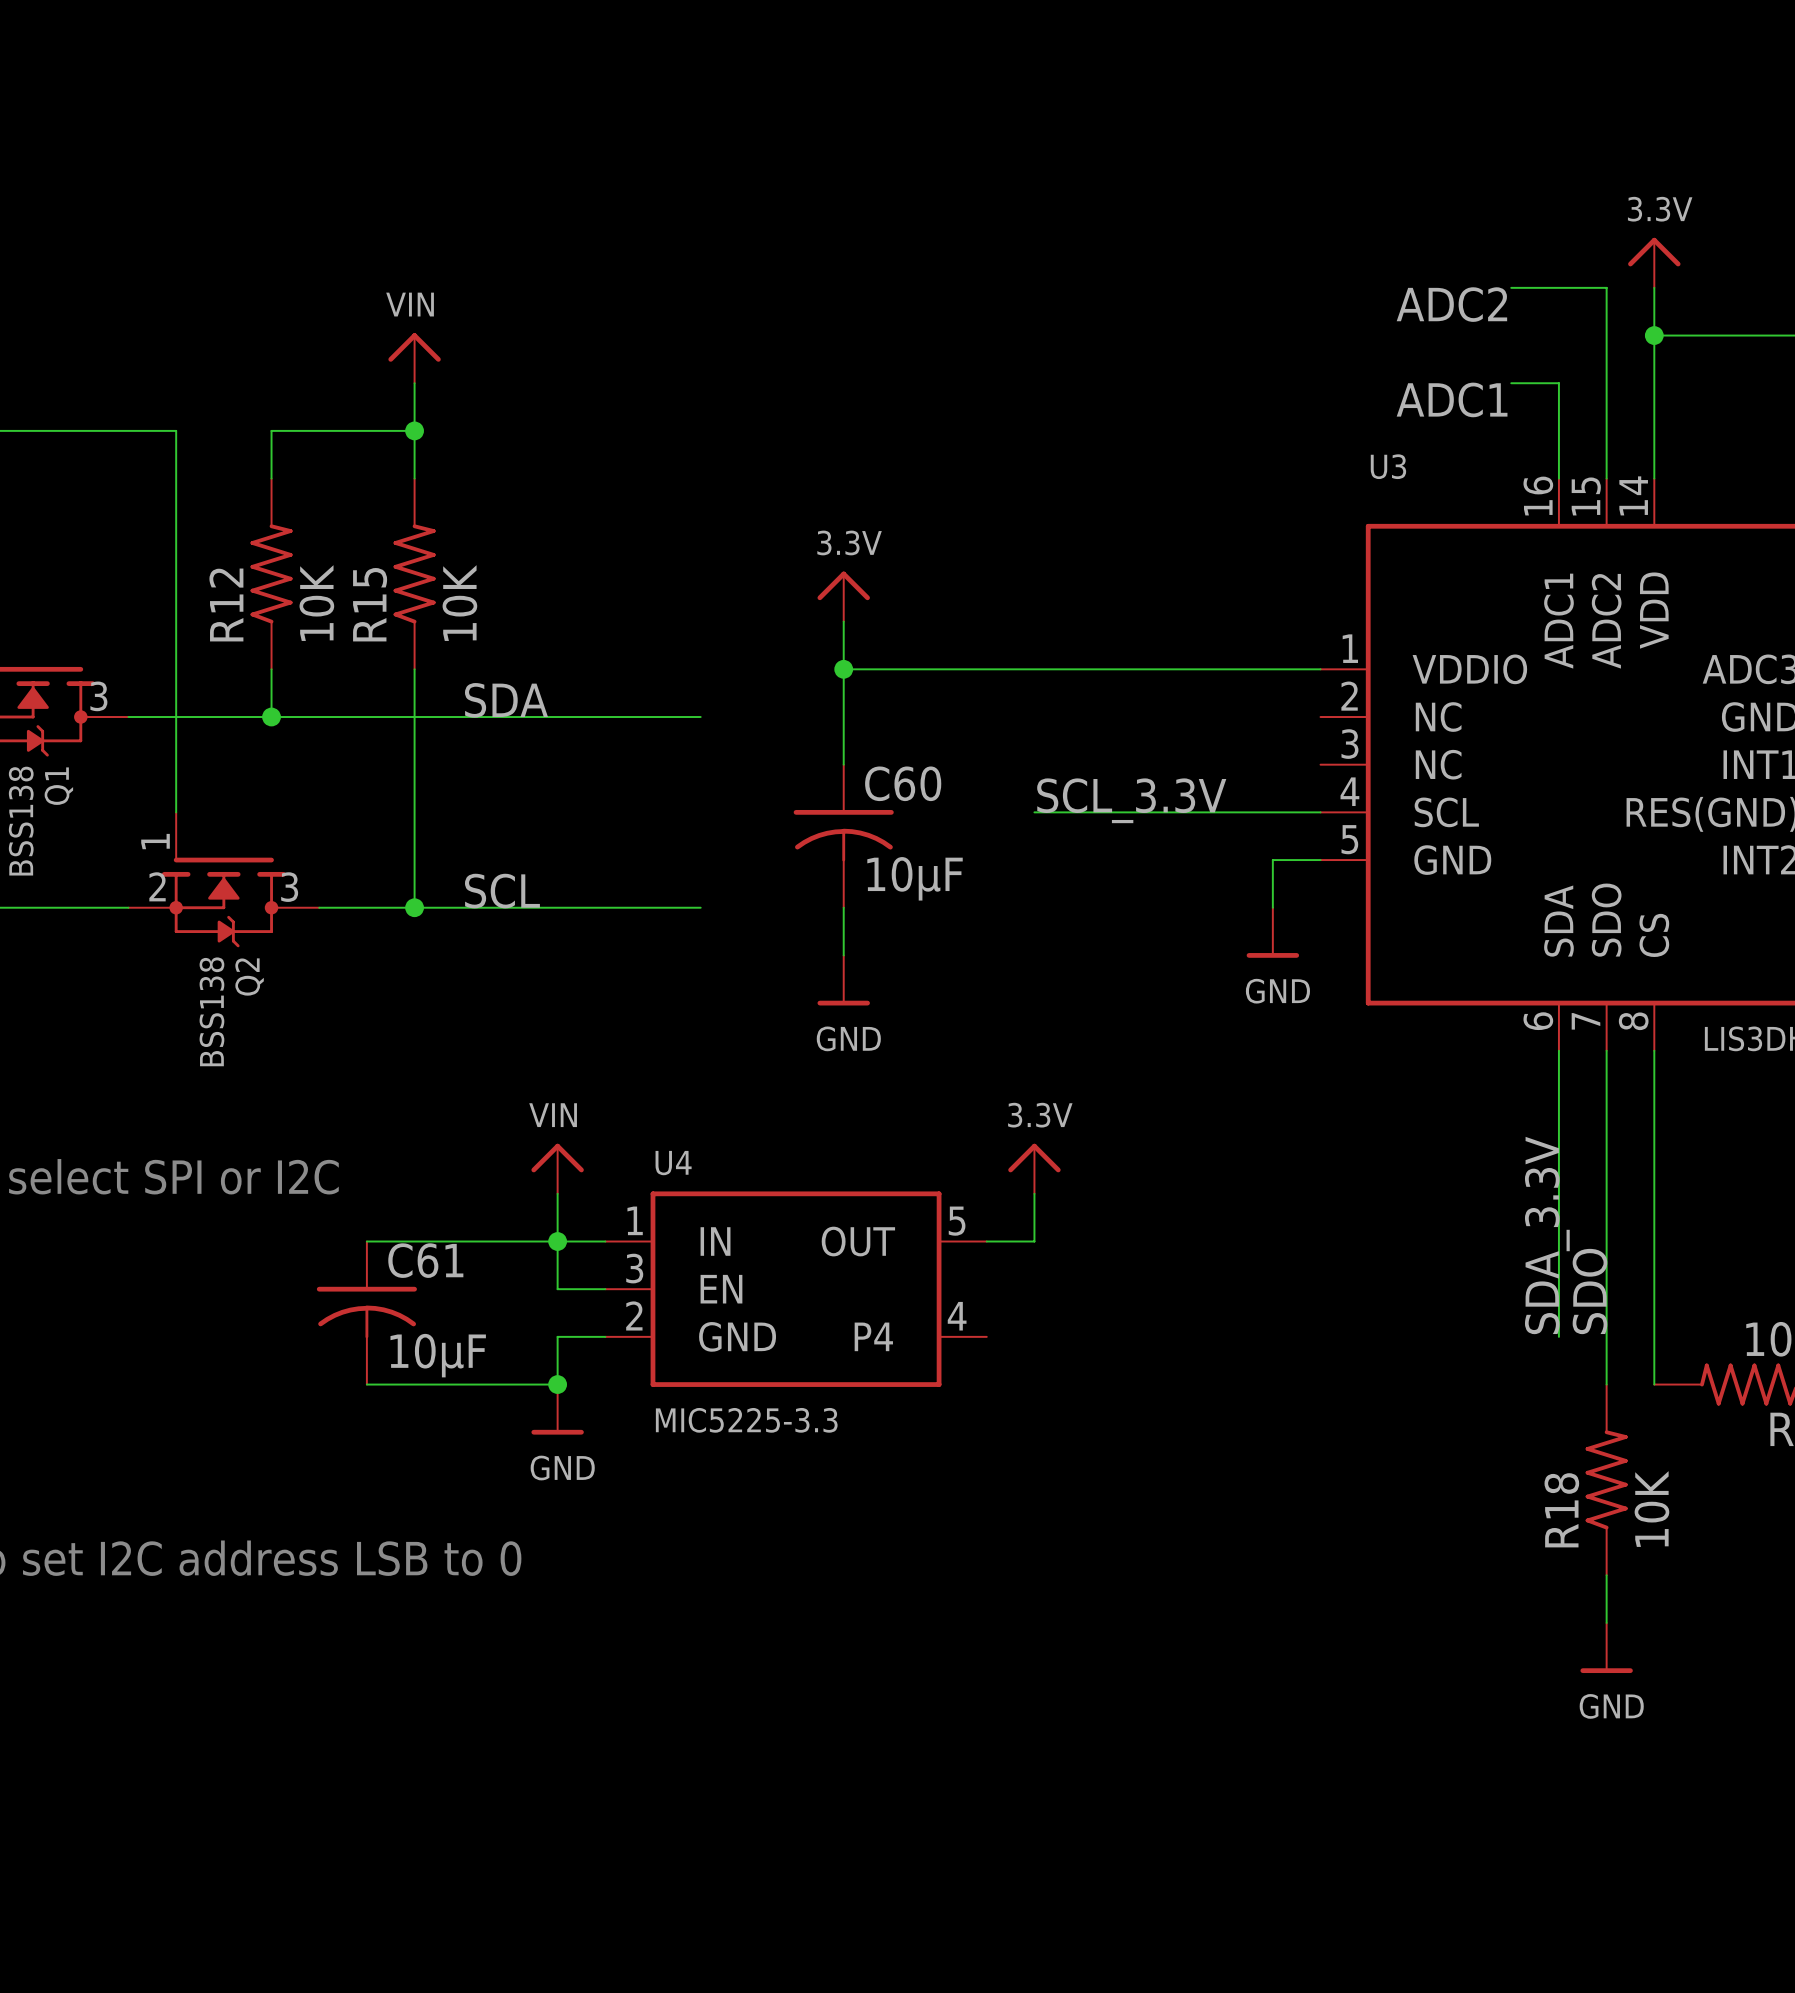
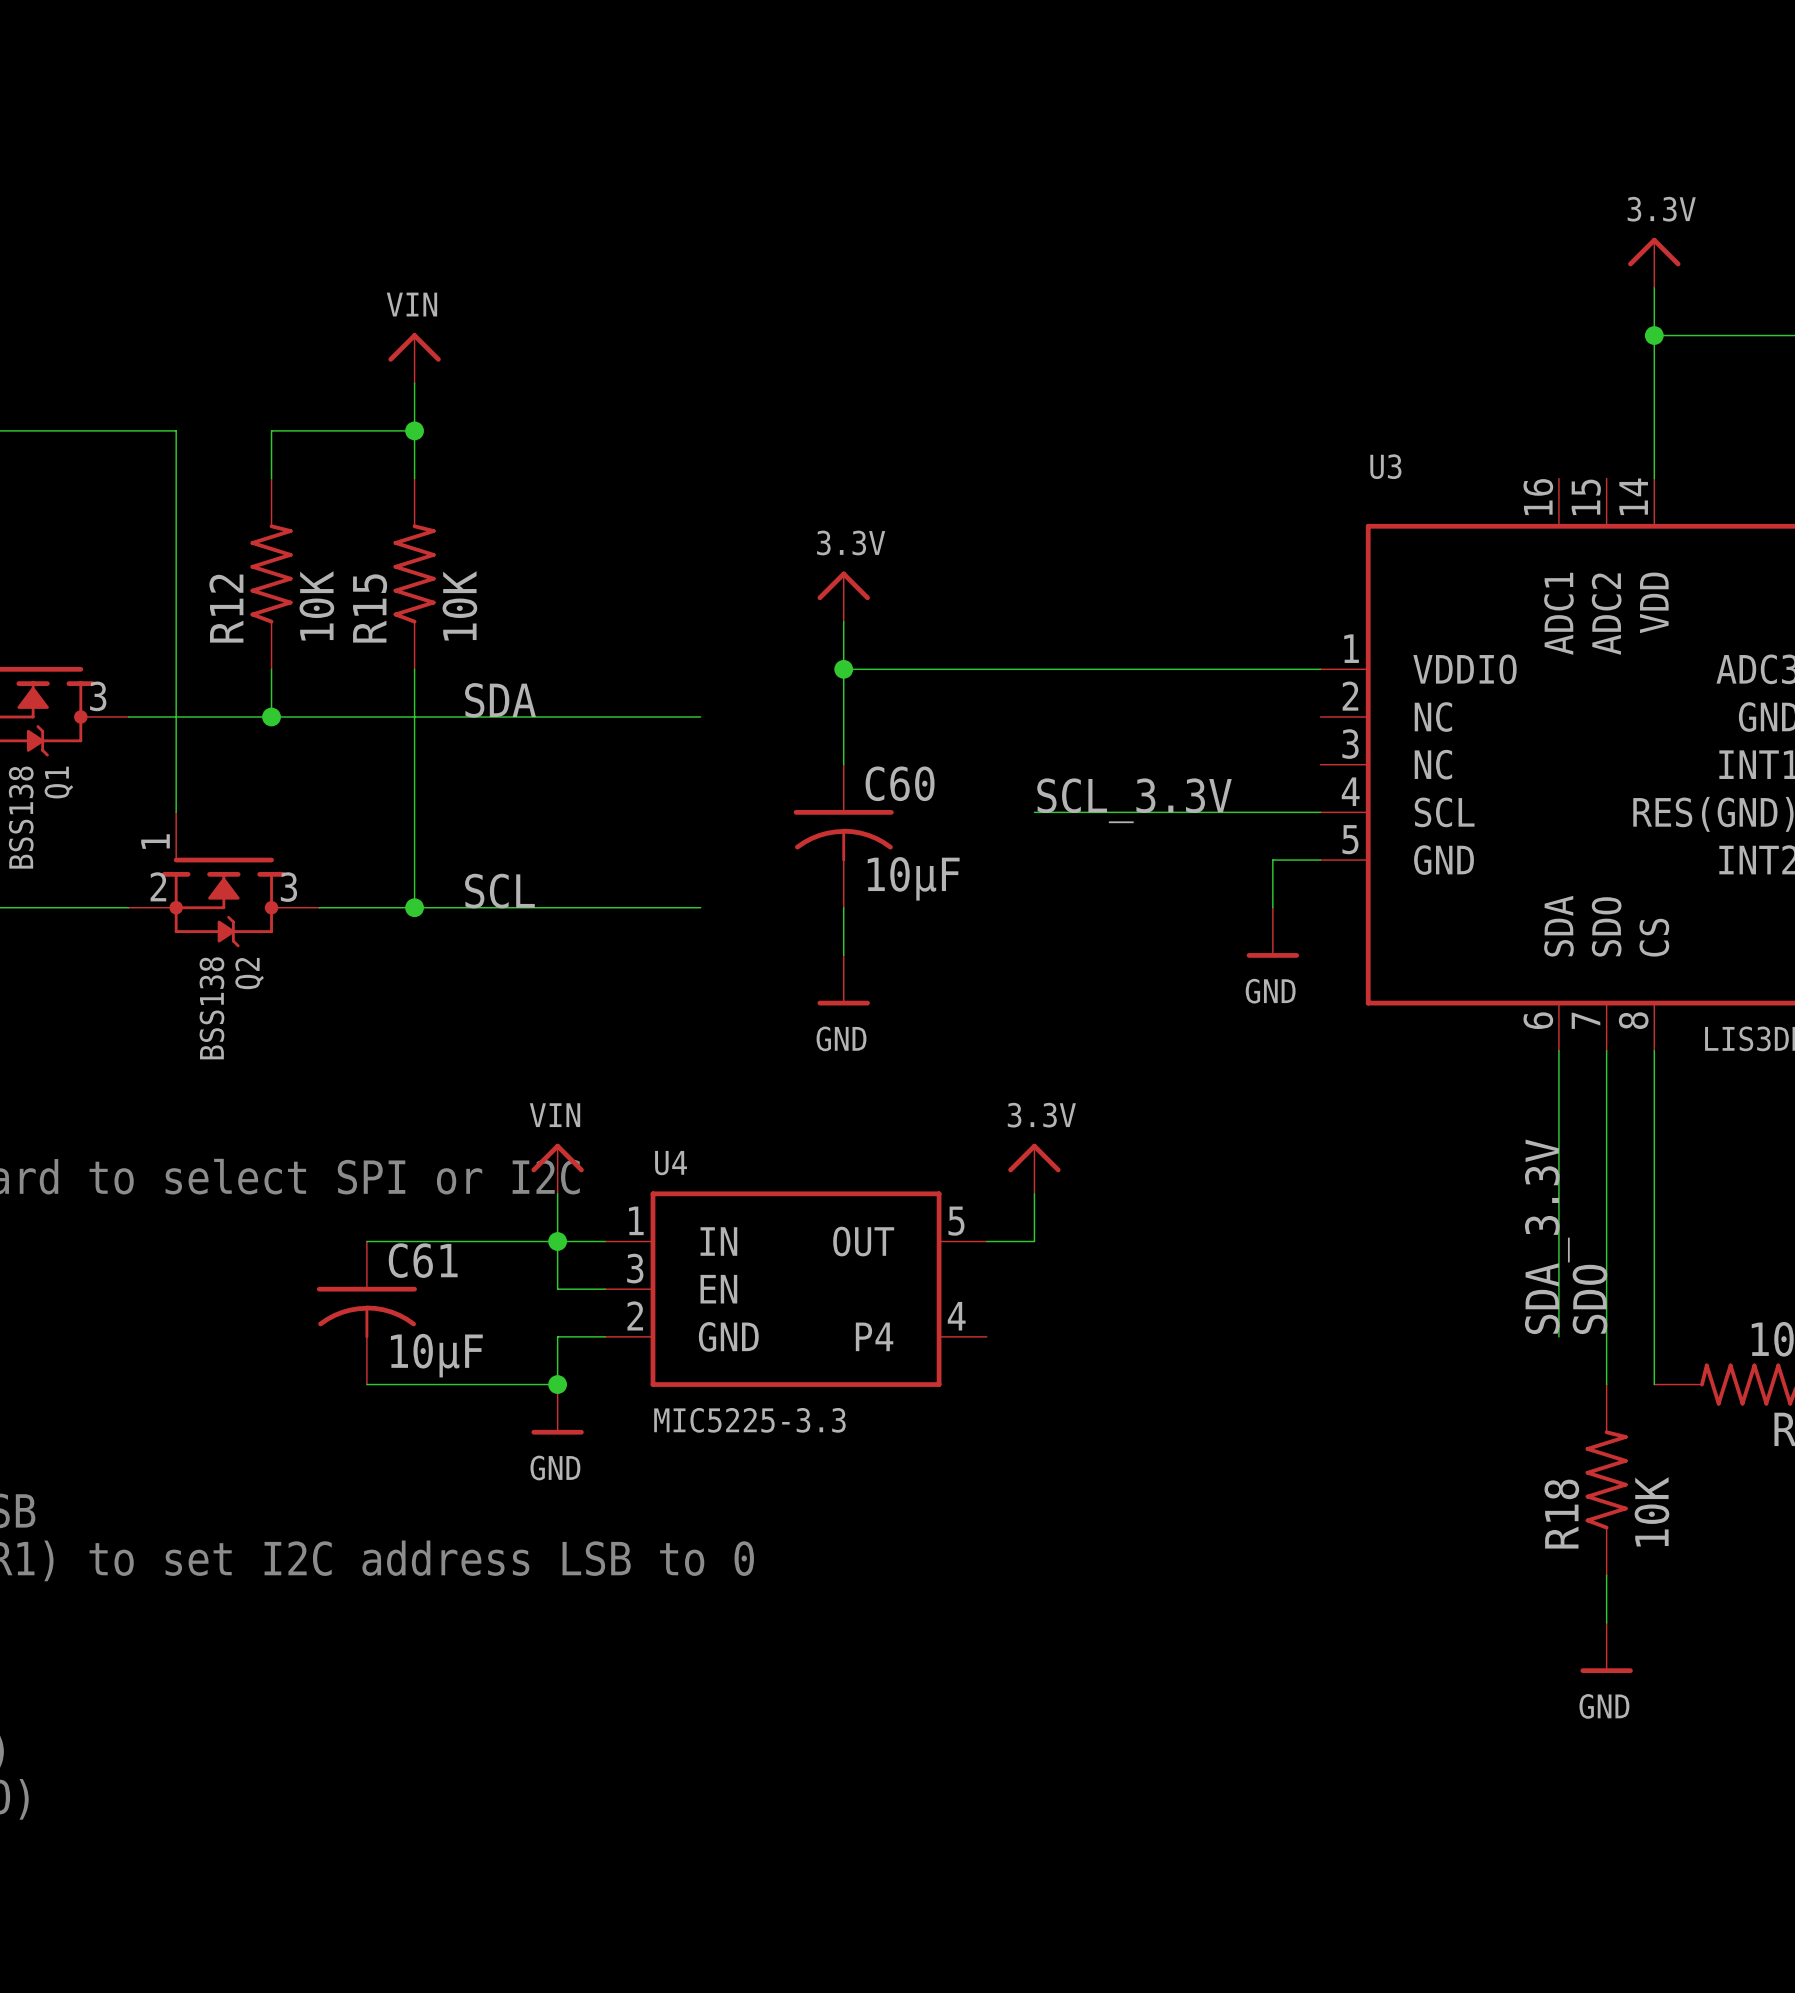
wire: (1511, 287) (1606, 287) (1606, 478) -> none
label: ADC2 (1451, 304) -> none
wire: (1511, 383) (1558, 383) (1558, 478) -> none
label: ADC1 (1452, 399) -> none

